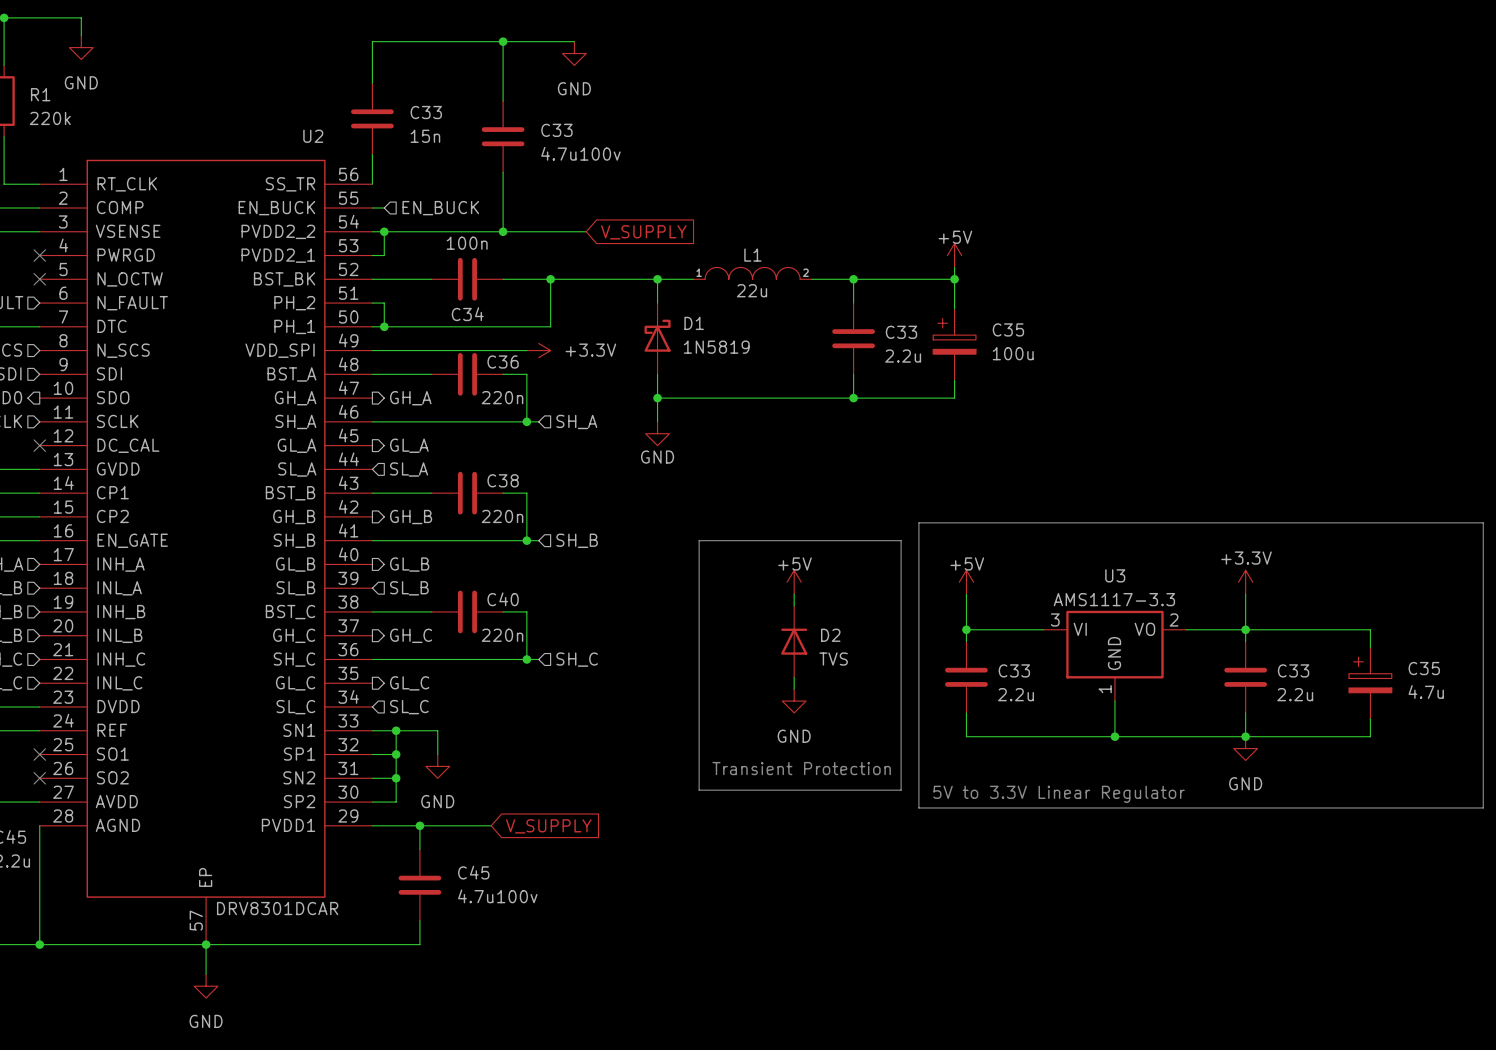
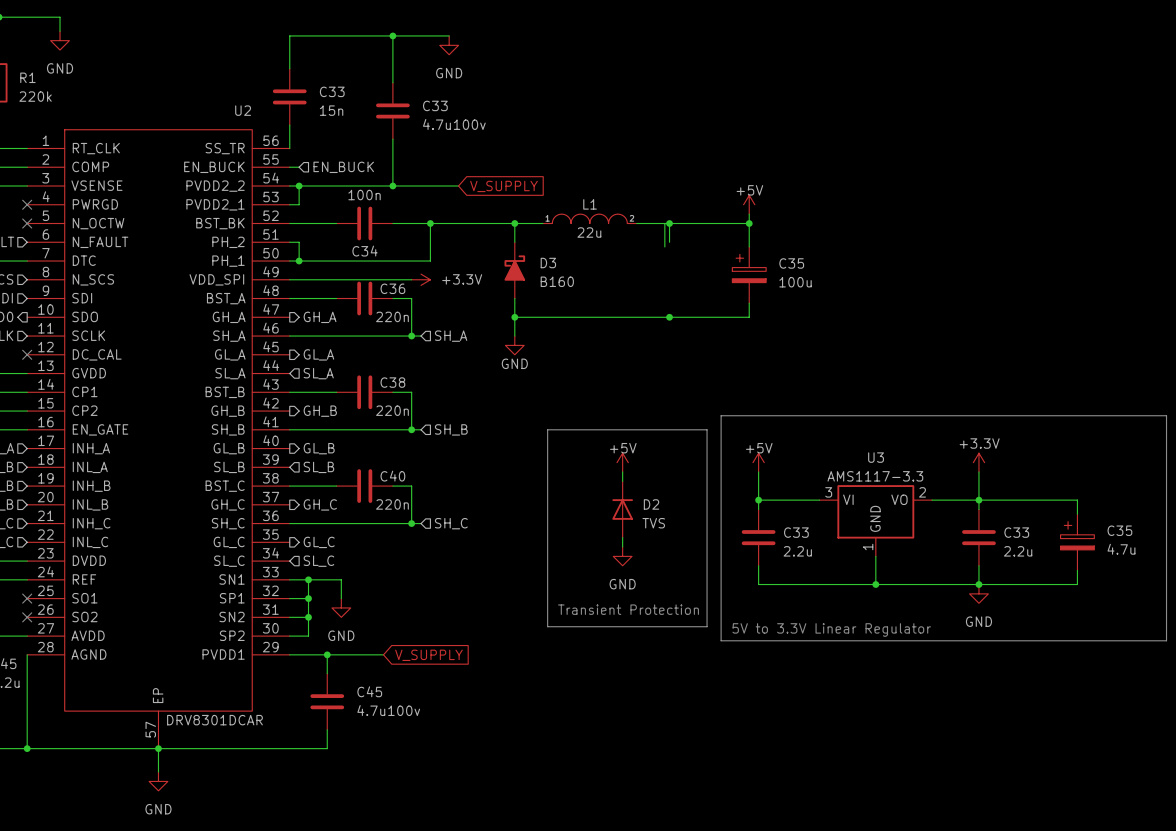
wire: none -> (664, 223) (664, 246)
D1: 1N5819 (657, 338) -> none
D3: none -> B160 (514, 270)
C33: 2.2u (853, 338) -> none
wire: (853, 374) (853, 398) -> none

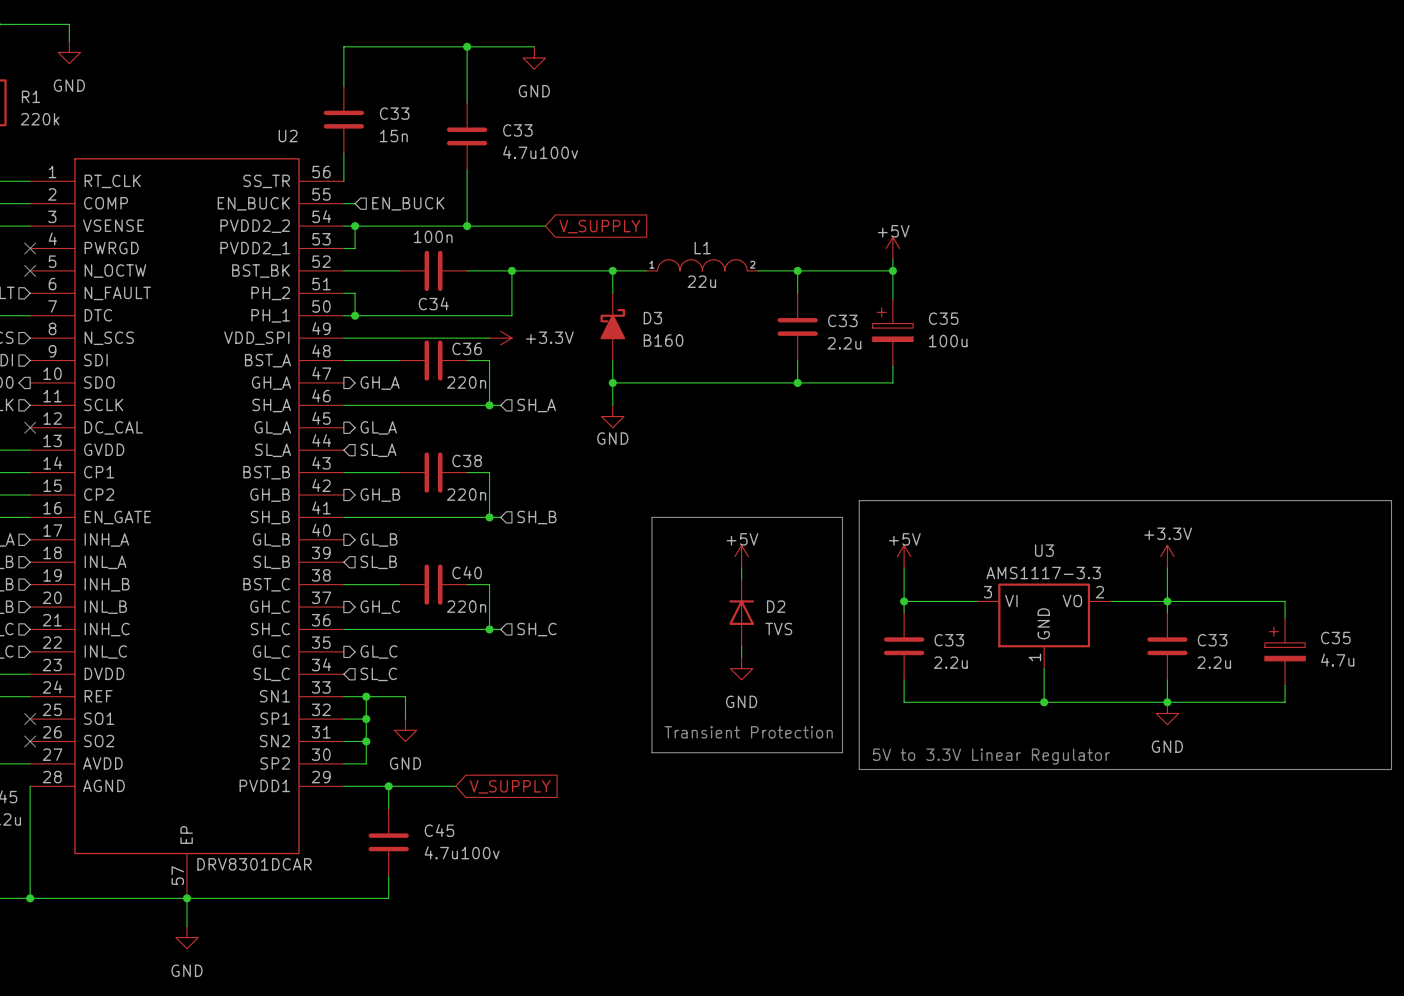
wire: (664, 223) (664, 246) -> none
C33: none -> 2.2u (797, 326)
wire: none -> (797, 360) (797, 382)

